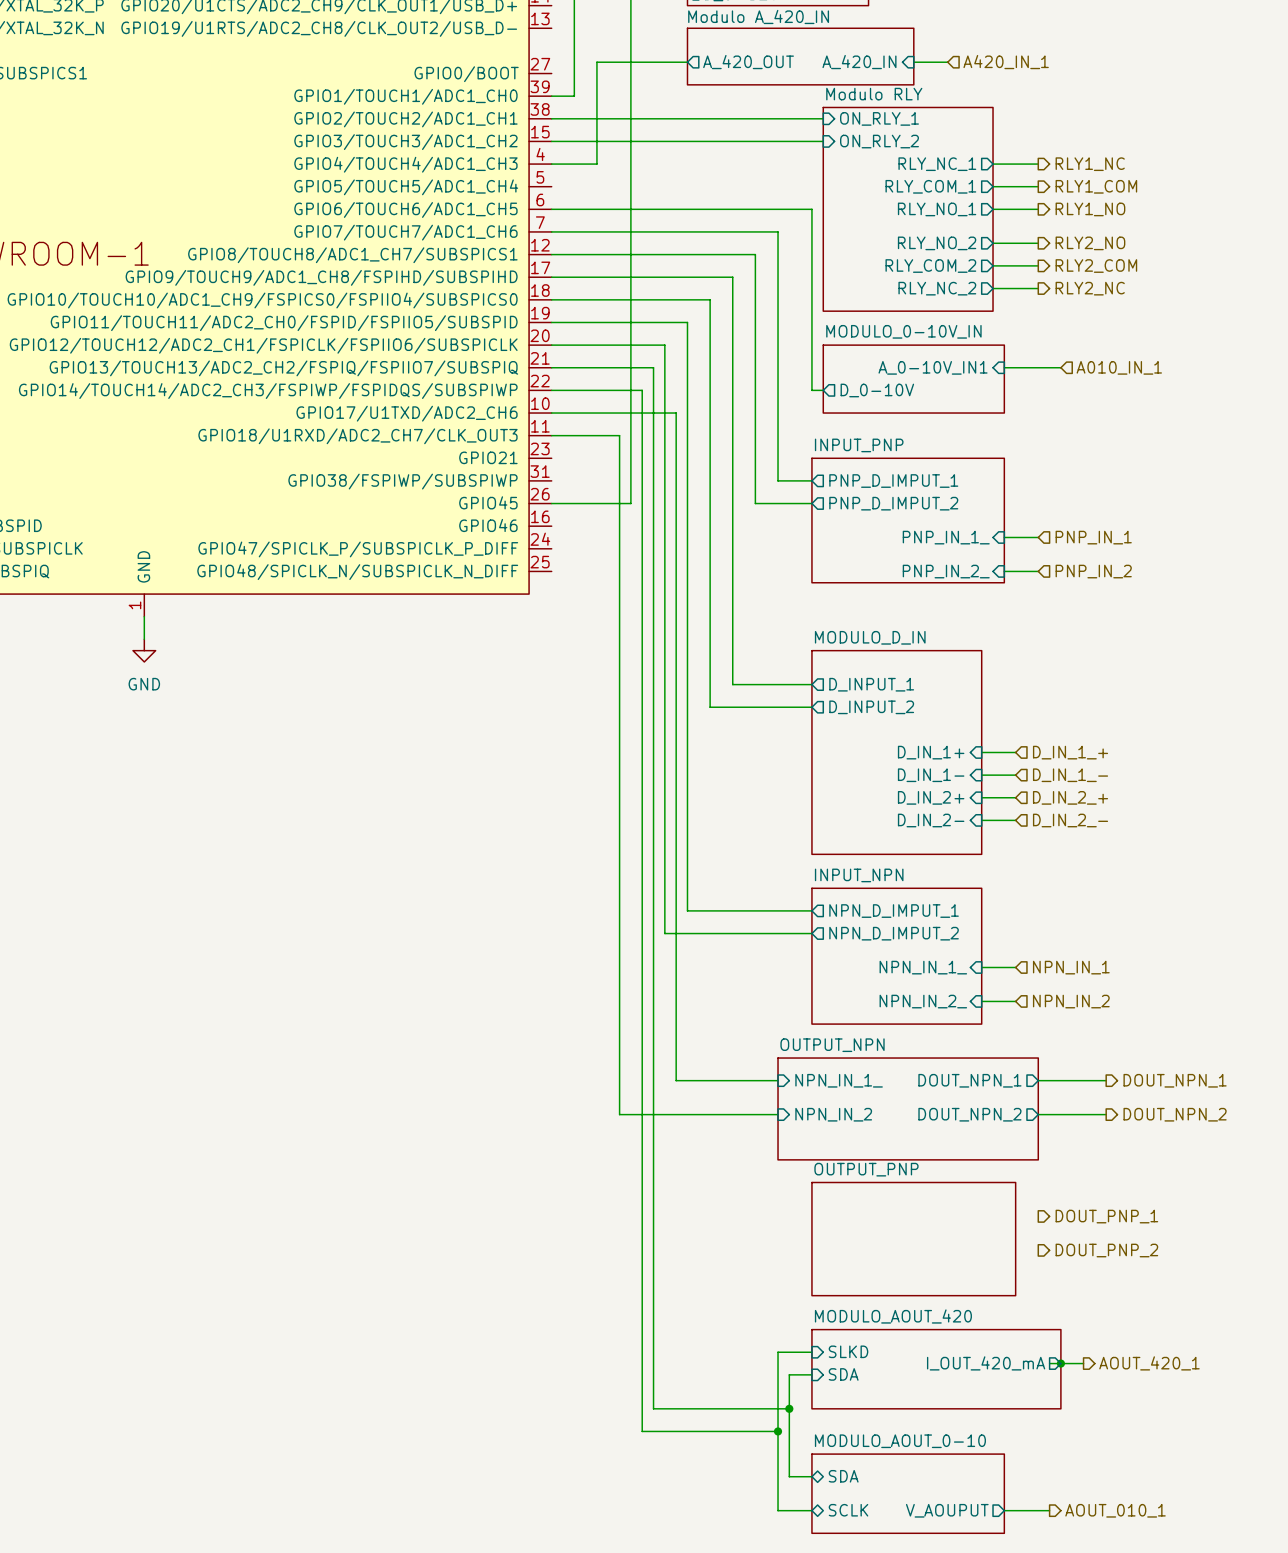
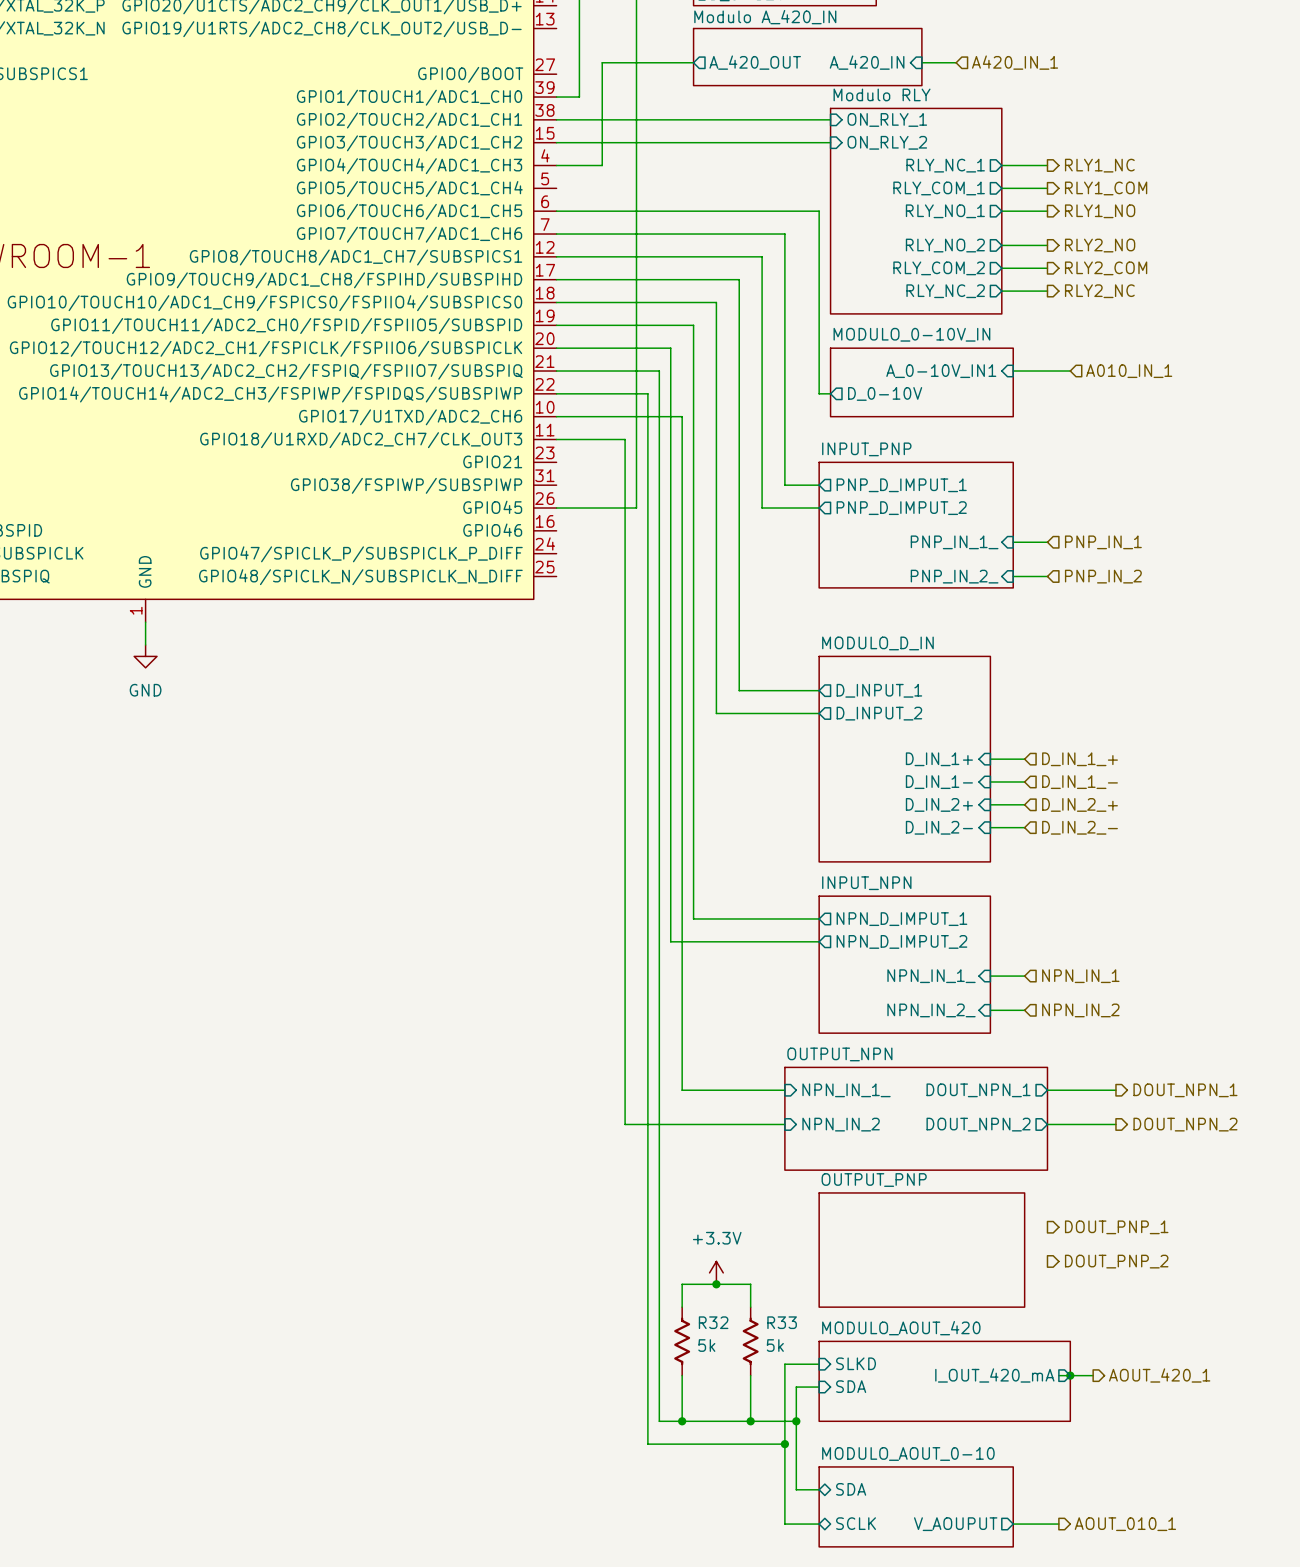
power symbol: none -> +3.3V (716, 1272)
junction: none -> (716, 1284)
wire: none -> (682, 1307) (682, 1284) (750, 1284) (750, 1307)
R32: none -> (682, 1341)
R33: none -> (750, 1341)
wire: none -> (682, 1375) (682, 1421)
wire: none -> (750, 1375) (750, 1421)
junction: none -> (682, 1421)
junction: none -> (750, 1421)

